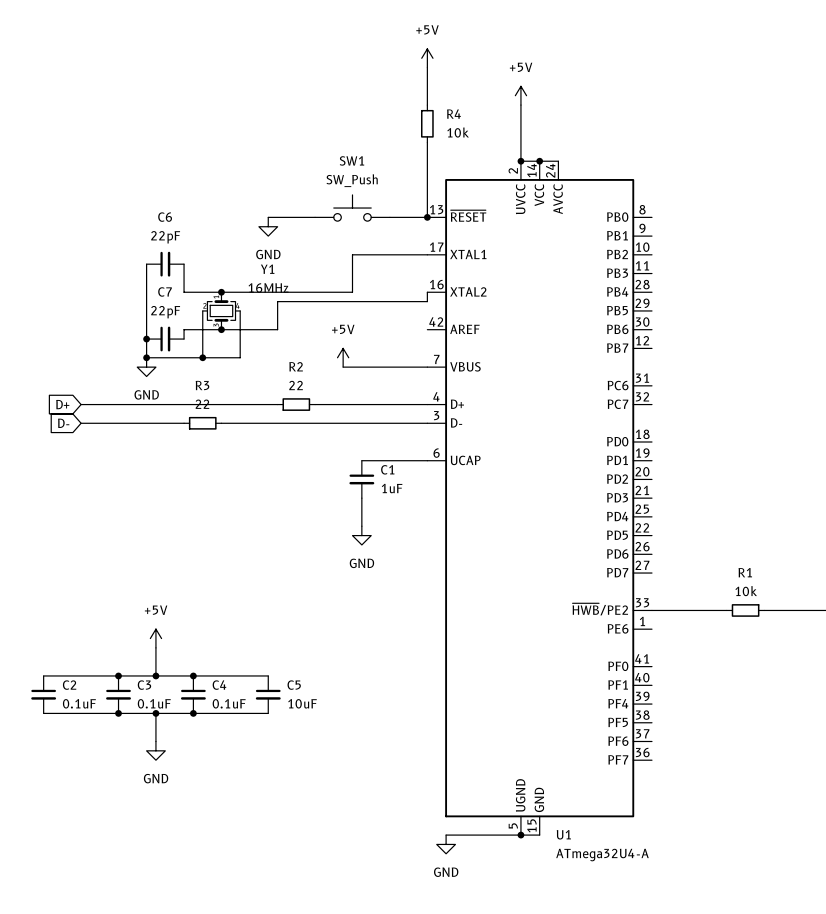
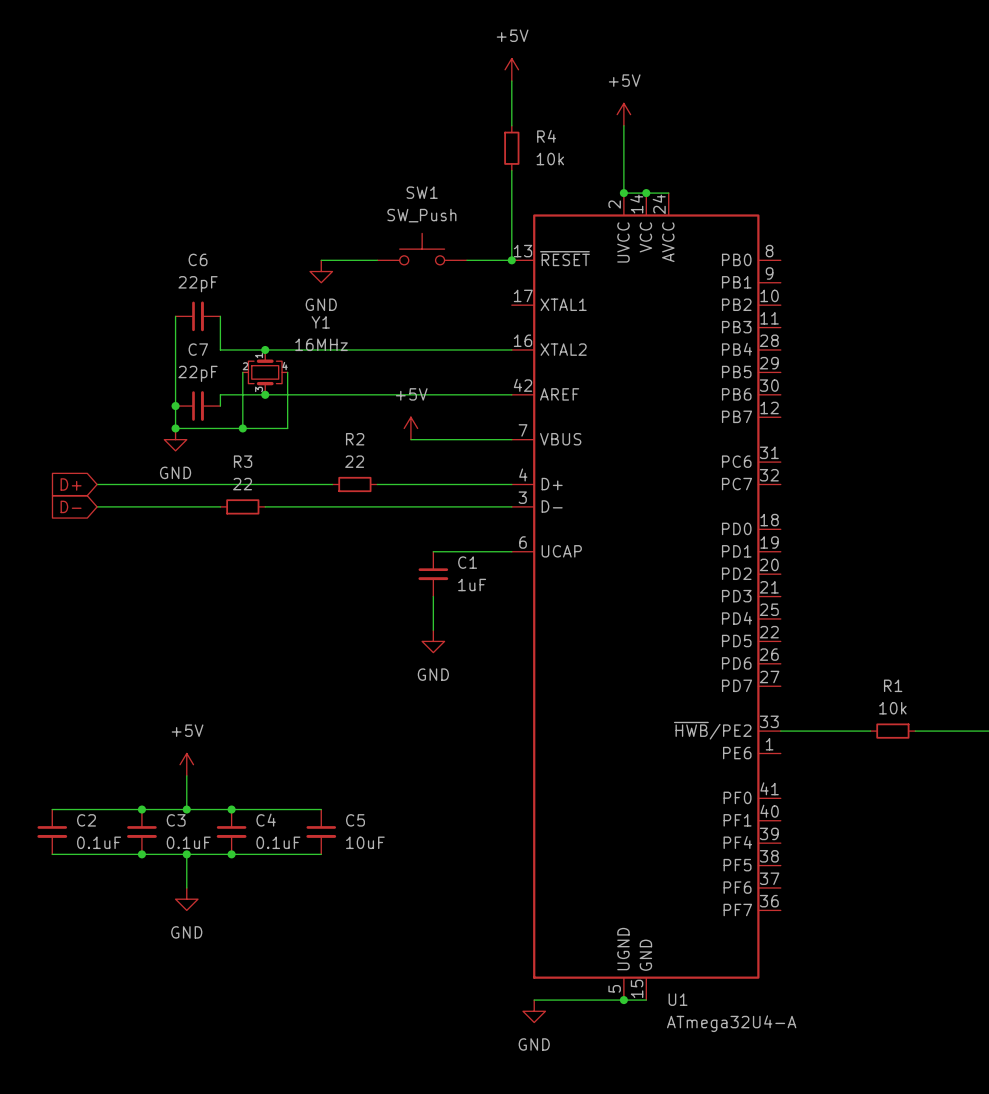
wire: (427, 254) (352, 254) (352, 292) -> (511, 349) (422, 349)
wire: (427, 292) (427, 301) (277, 301) (277, 329) -> (511, 394) (332, 394)

